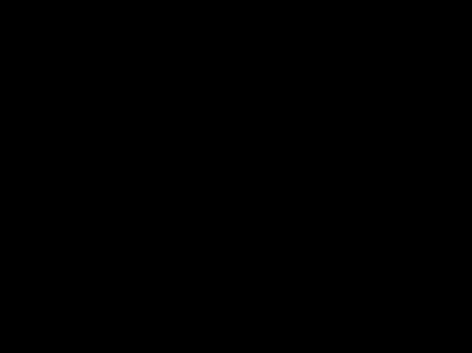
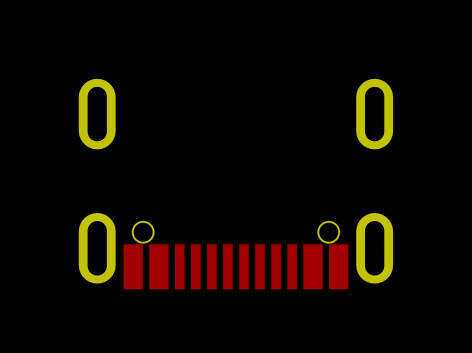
part: none -> (235, 184)

